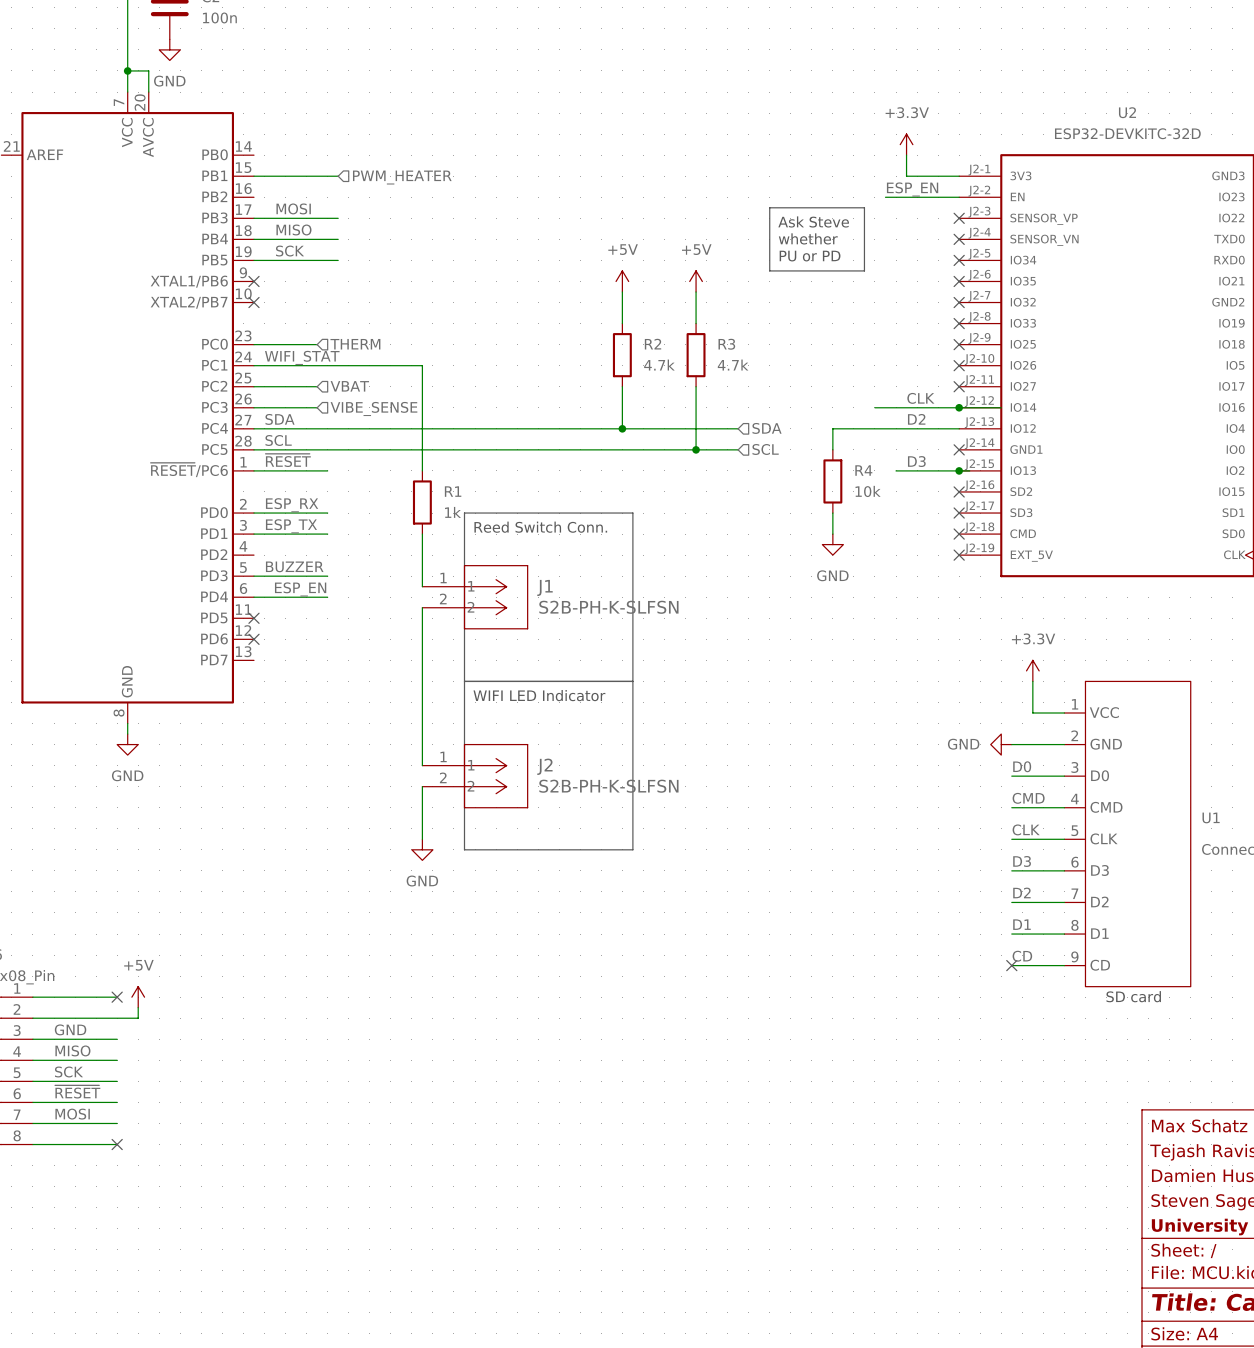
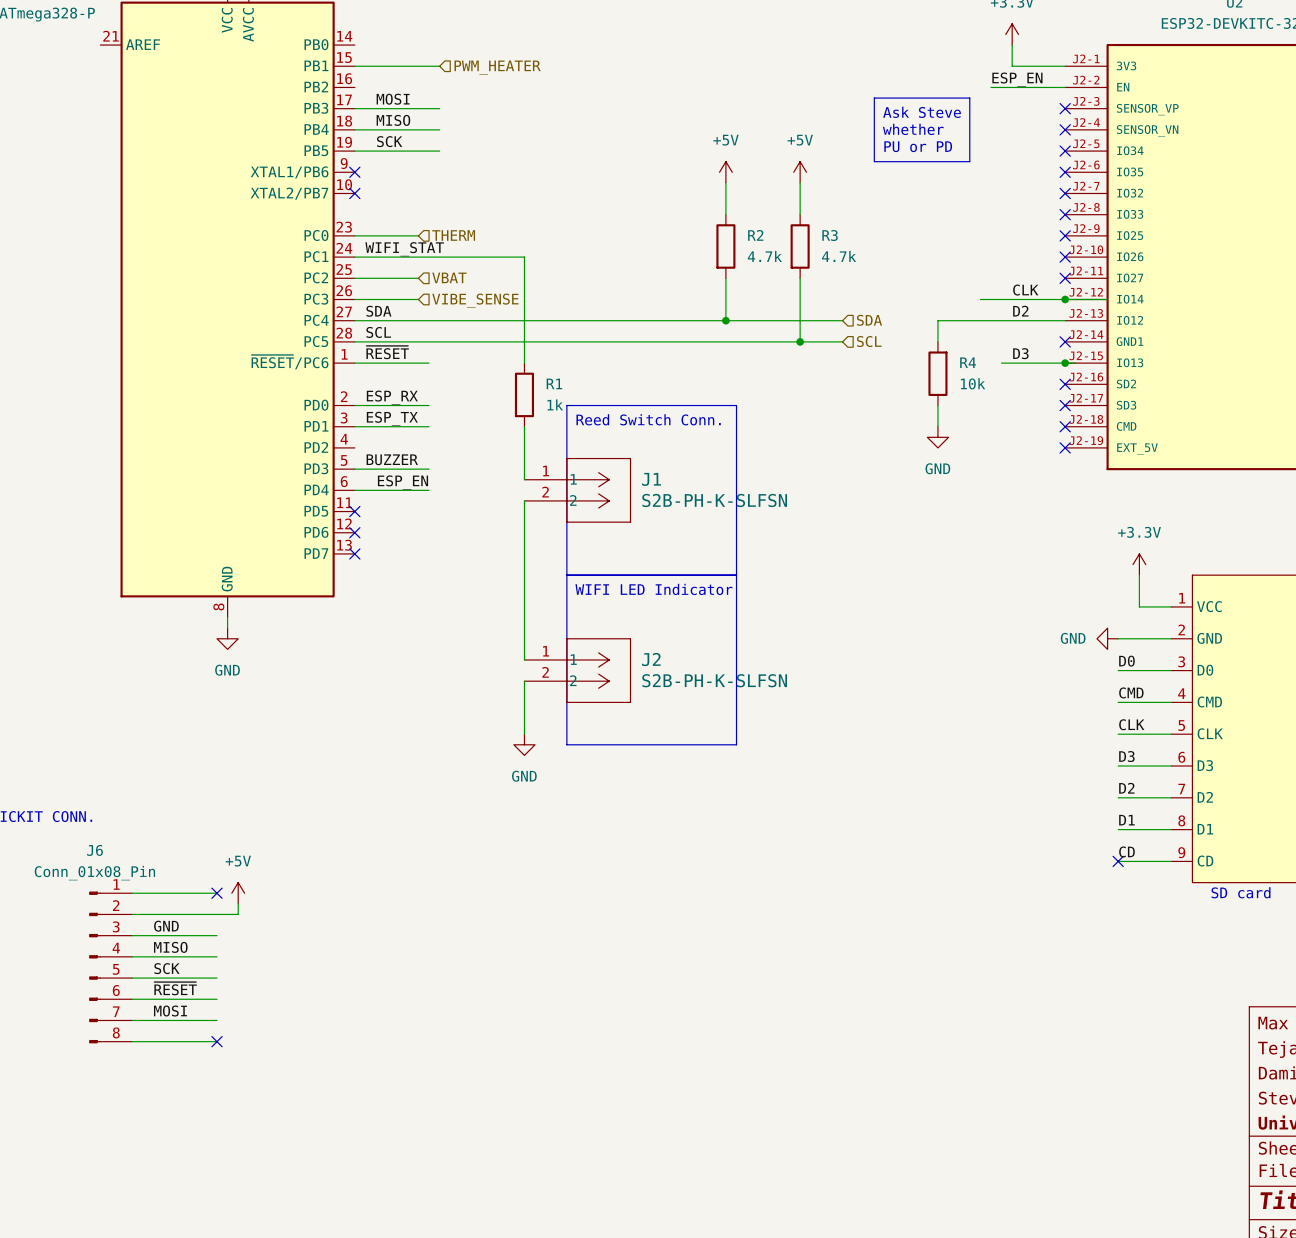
no-connect mark: none -> (354, 553)

